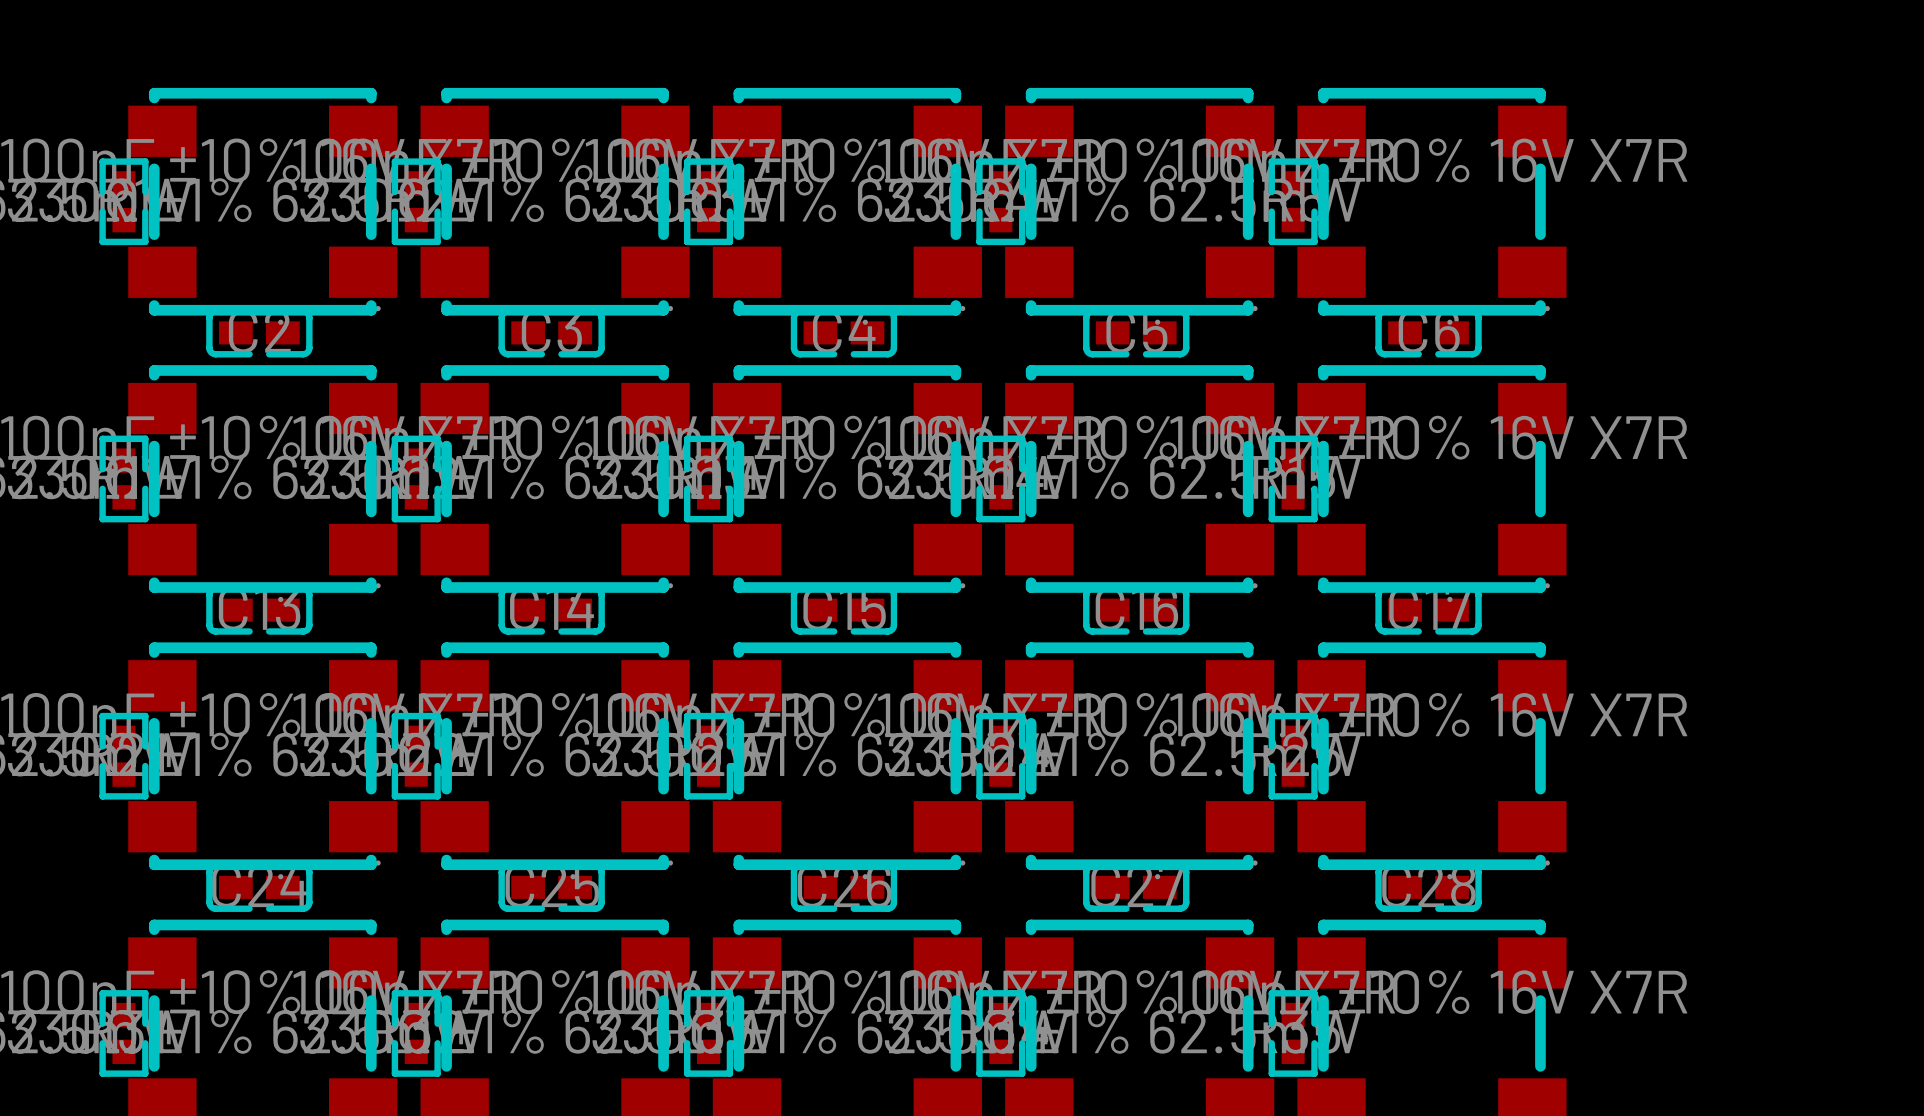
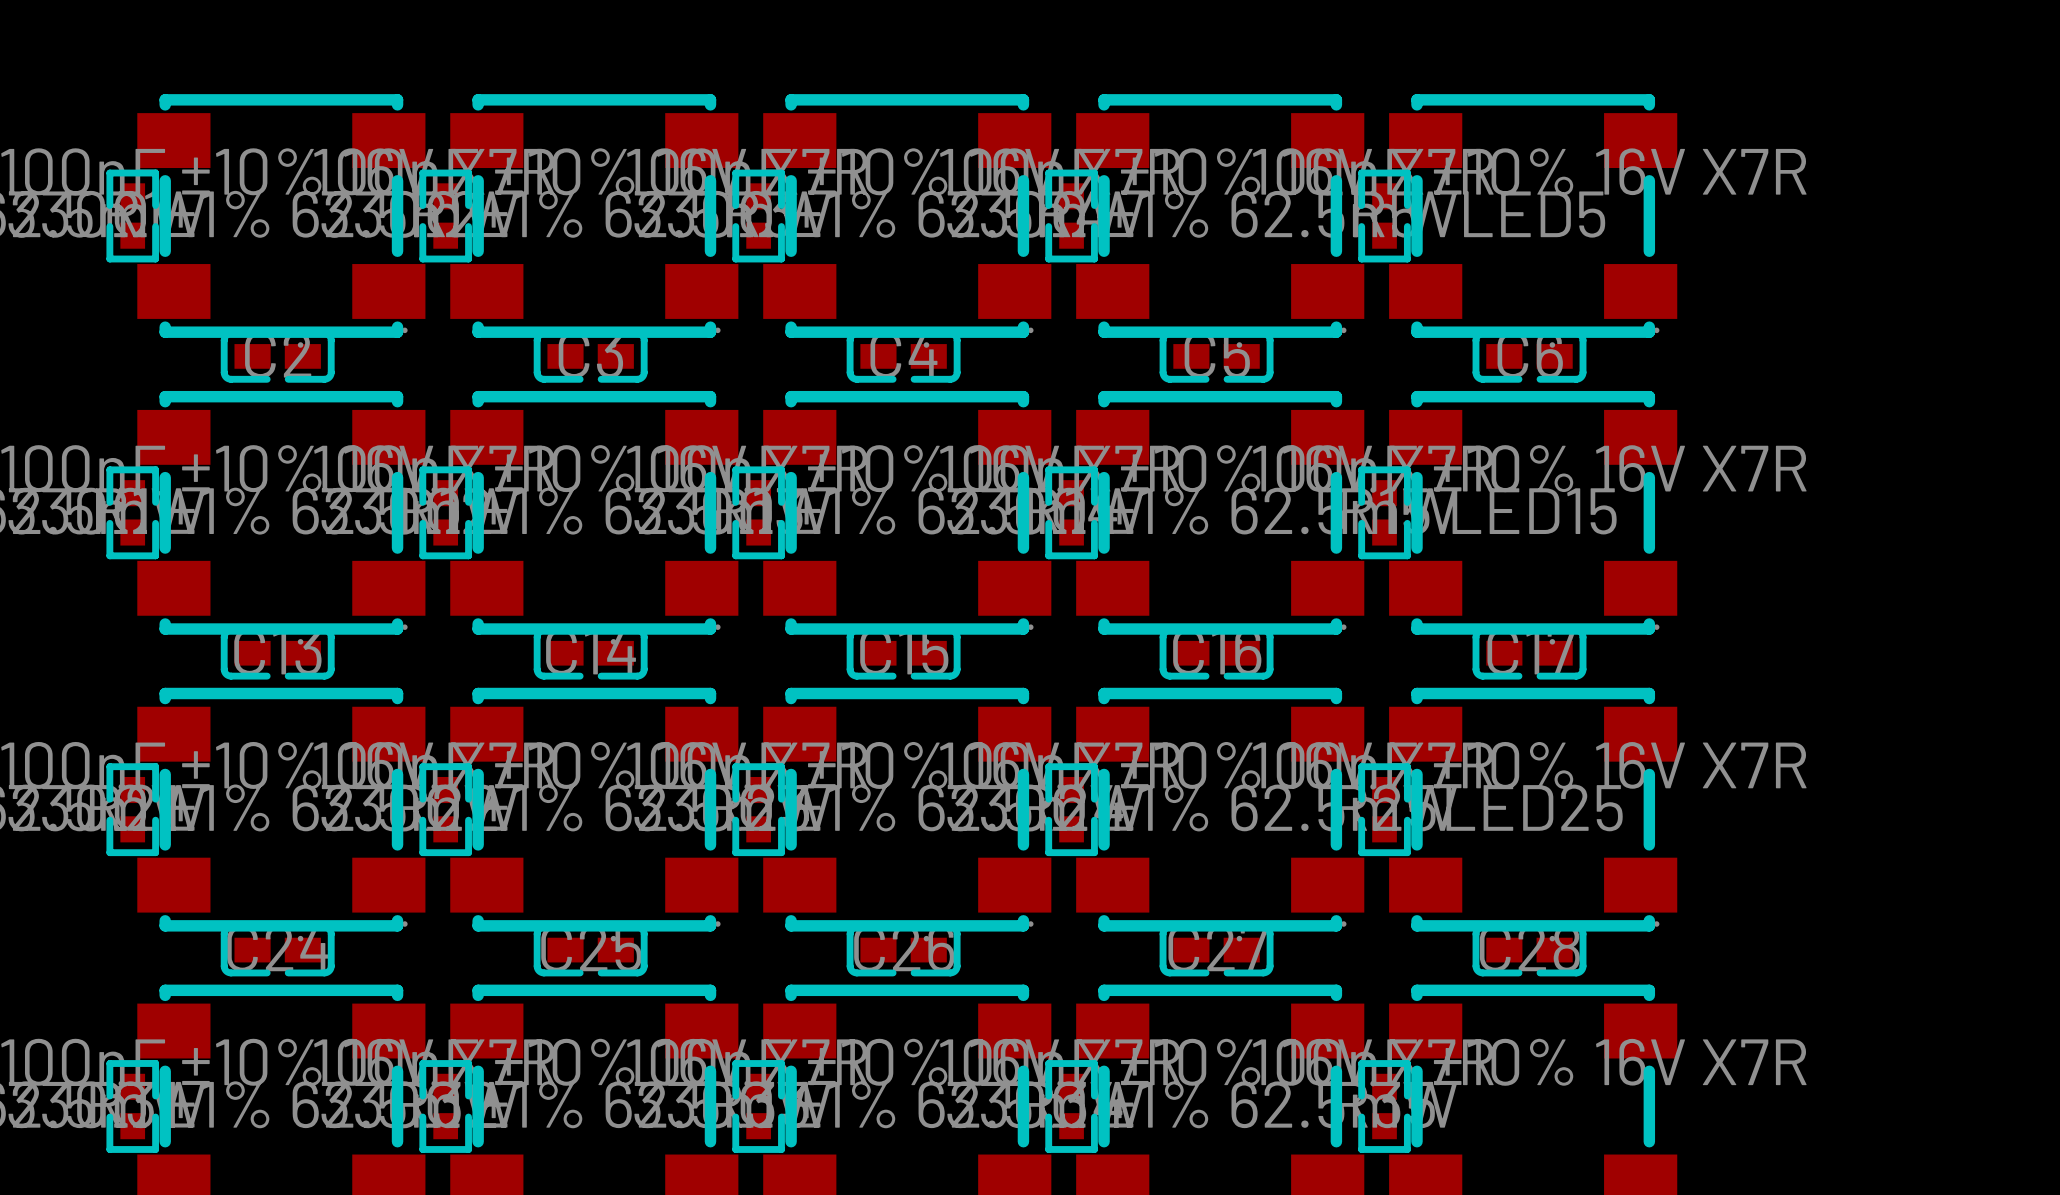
LED5 name: none -> LED5 (1534, 214)
LED15 name: none -> LED15 (1534, 511)
LED25 name: none -> LED25 (1534, 807)

